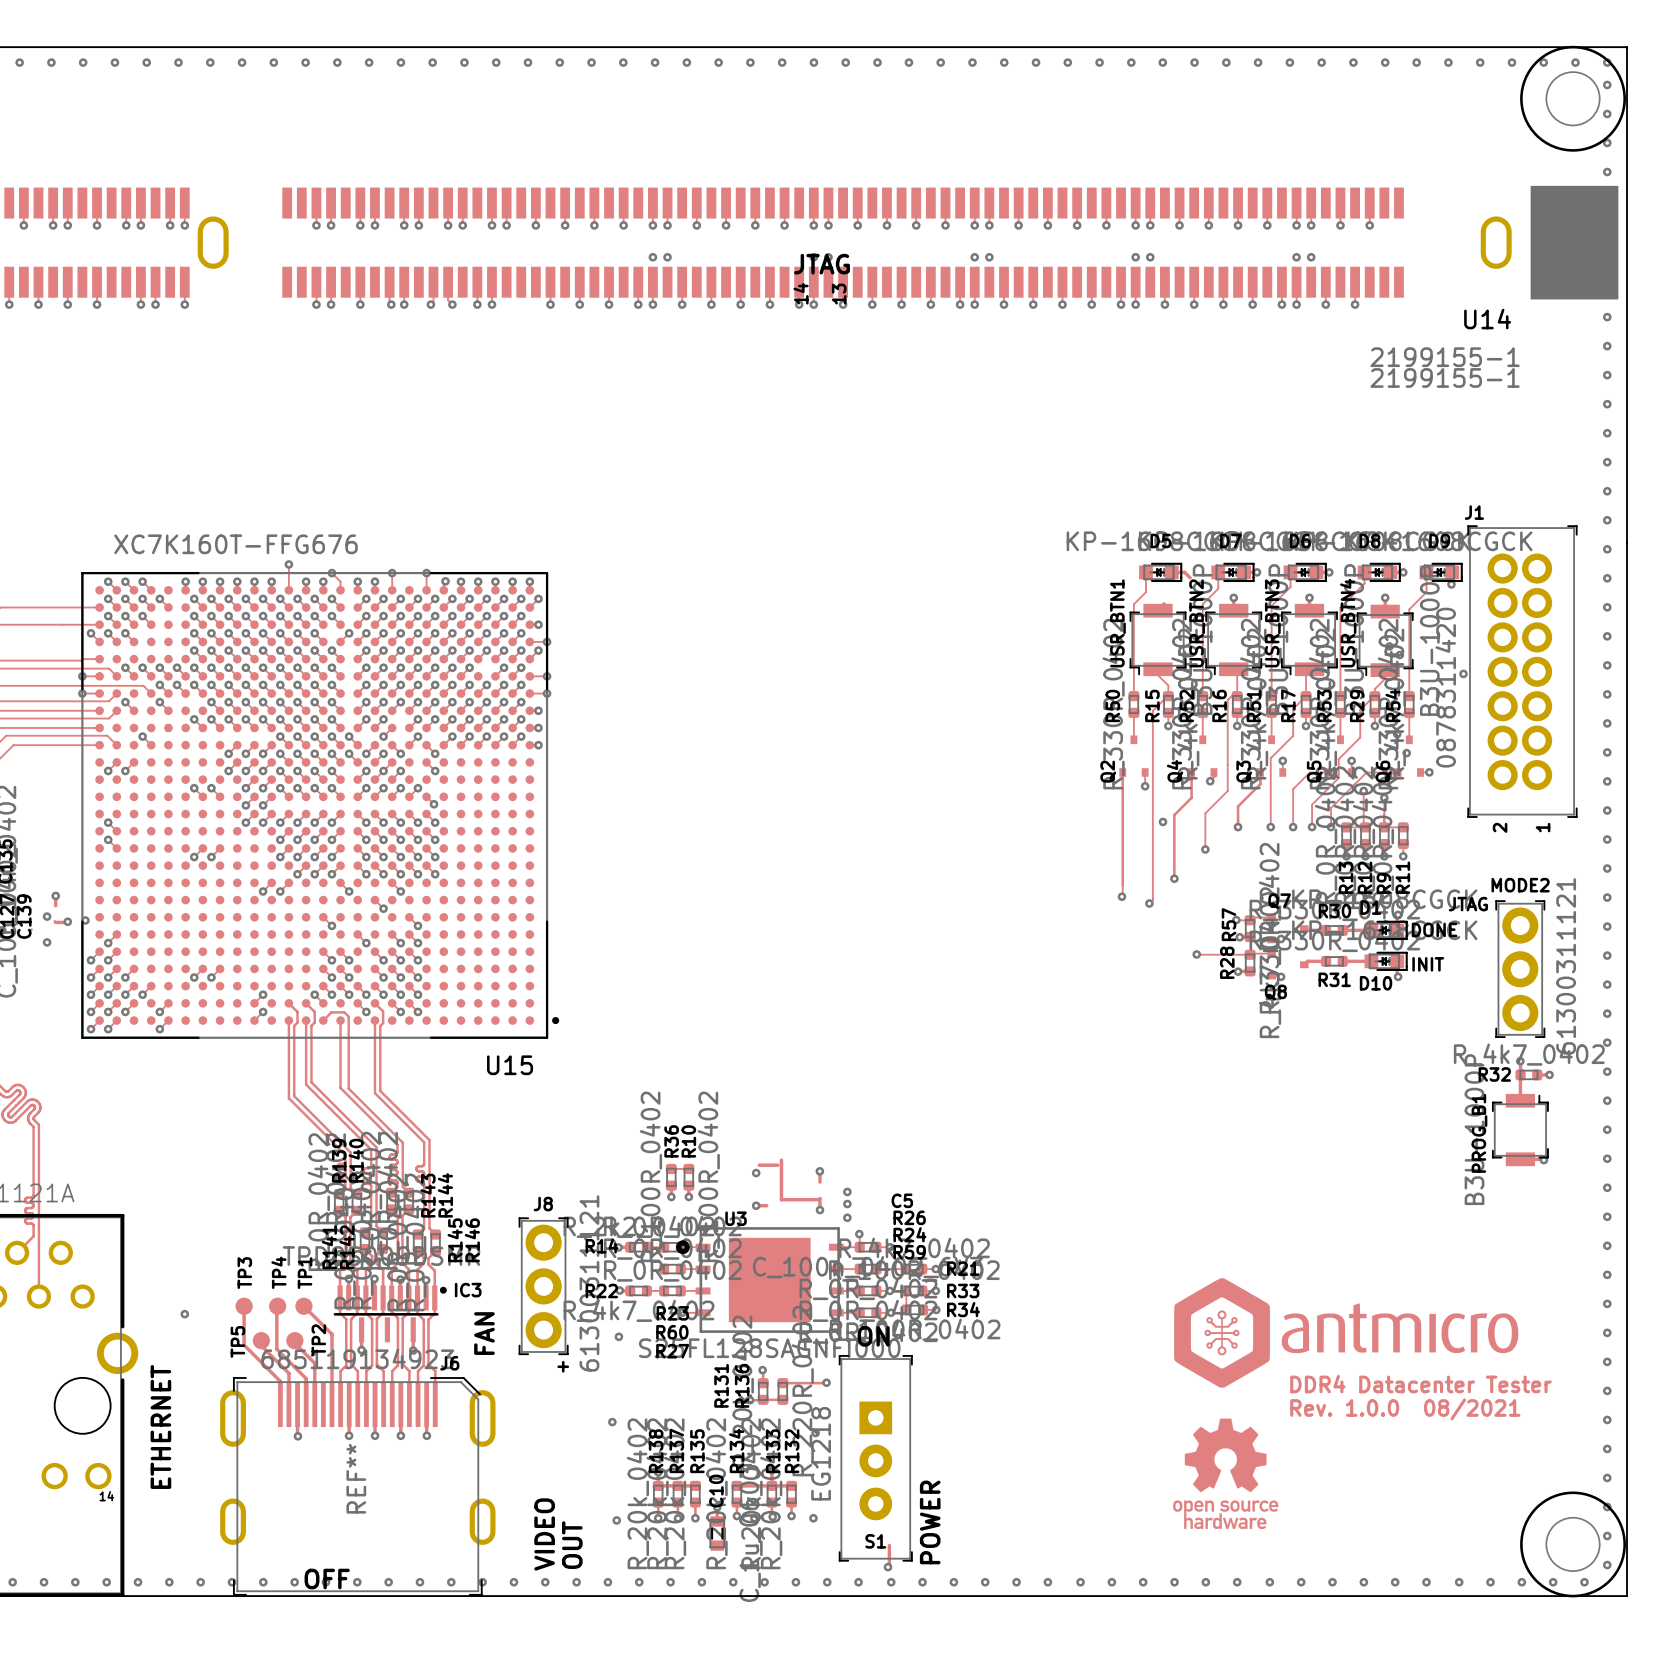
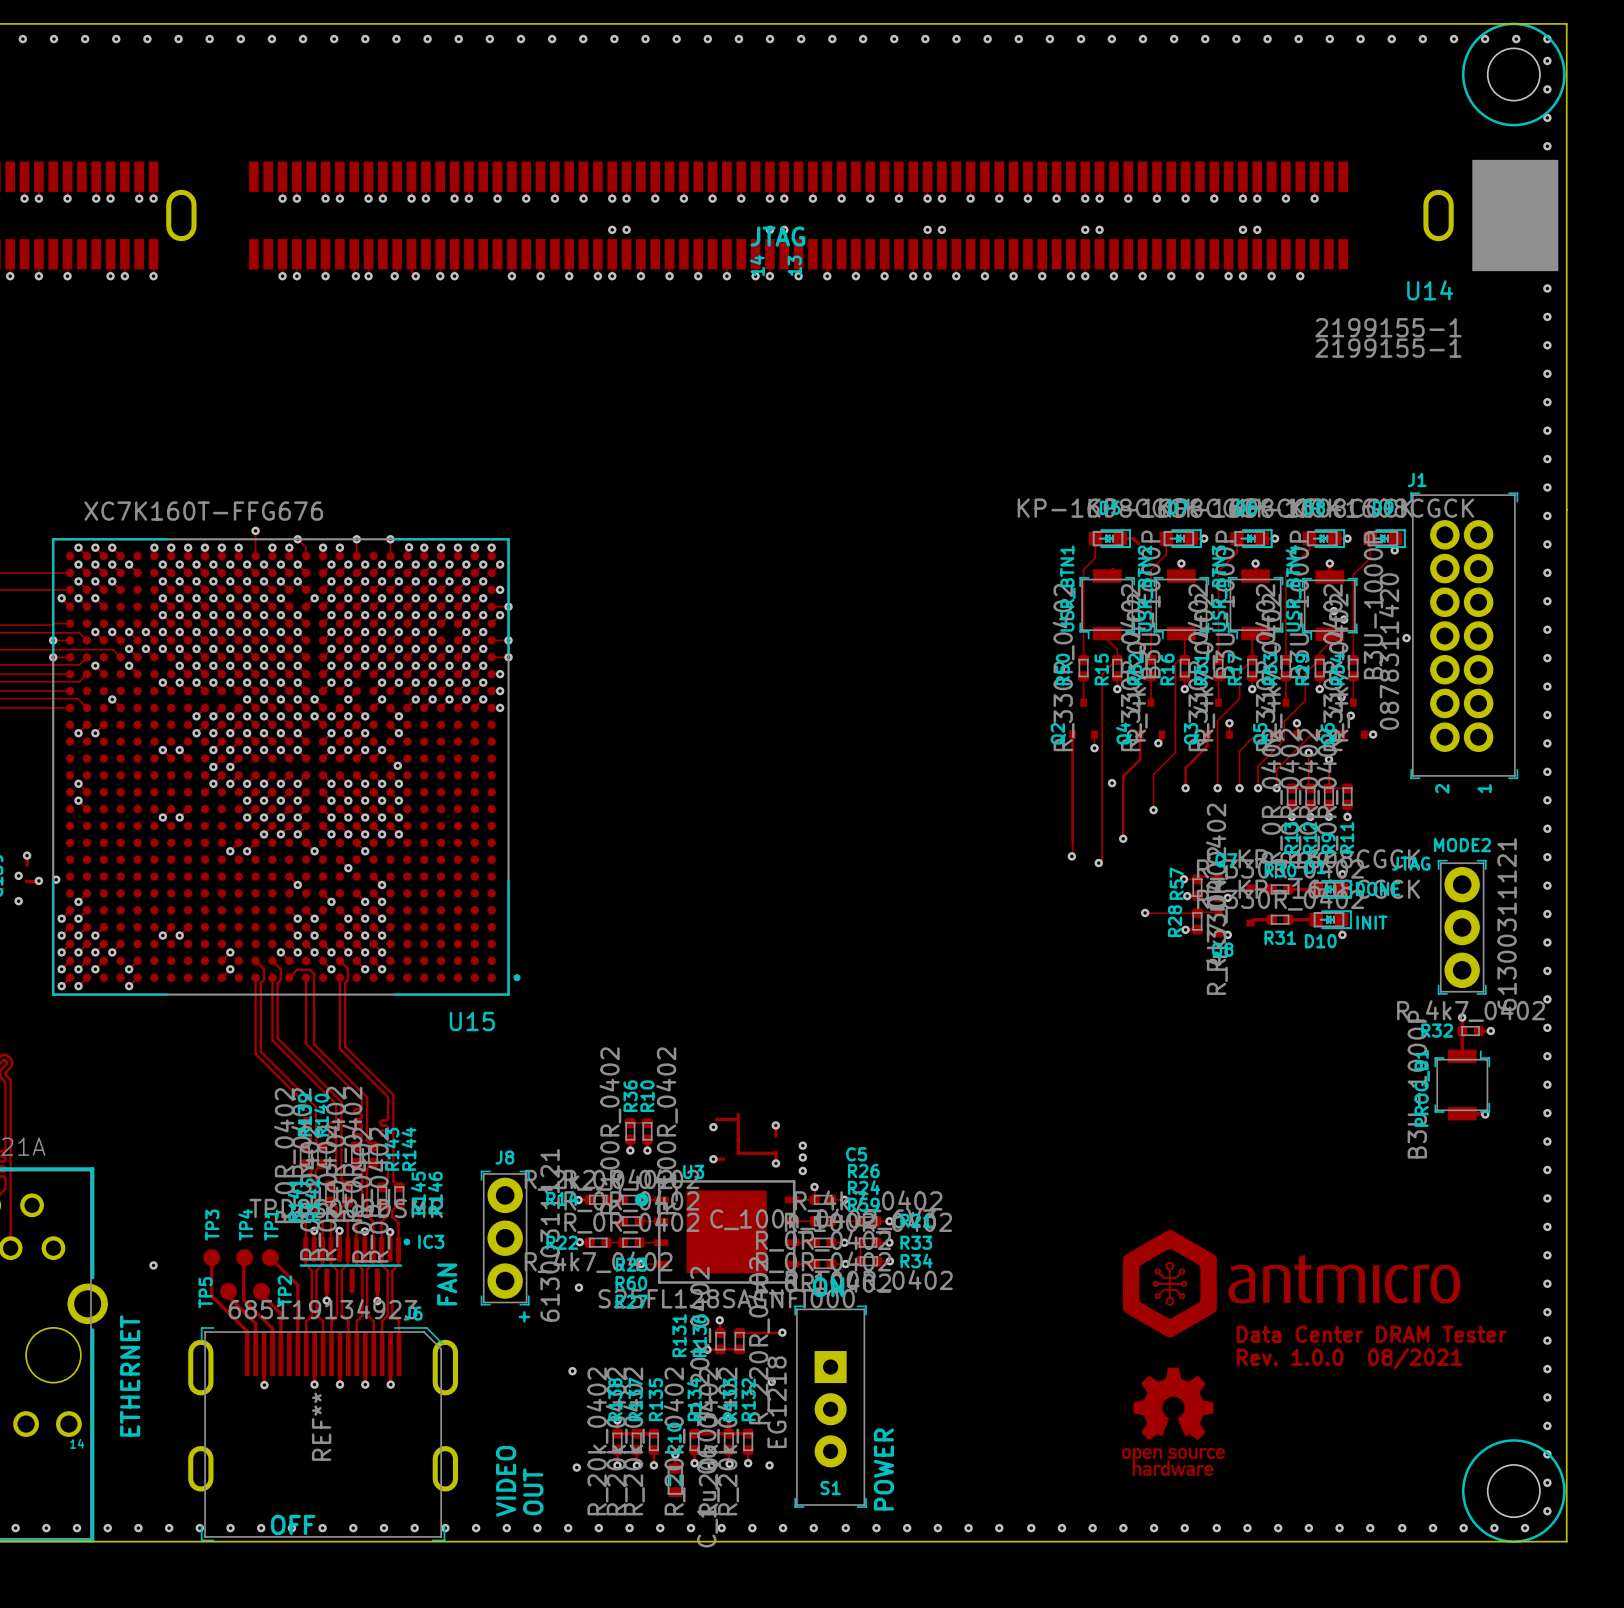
text: DDR4 Datacenter Tester (1420, 1384) -> Data Center DRAM Tester (1371, 1334)
track: (889, 1545) (888, 1567) -> none
via: (888, 1567) -> none

